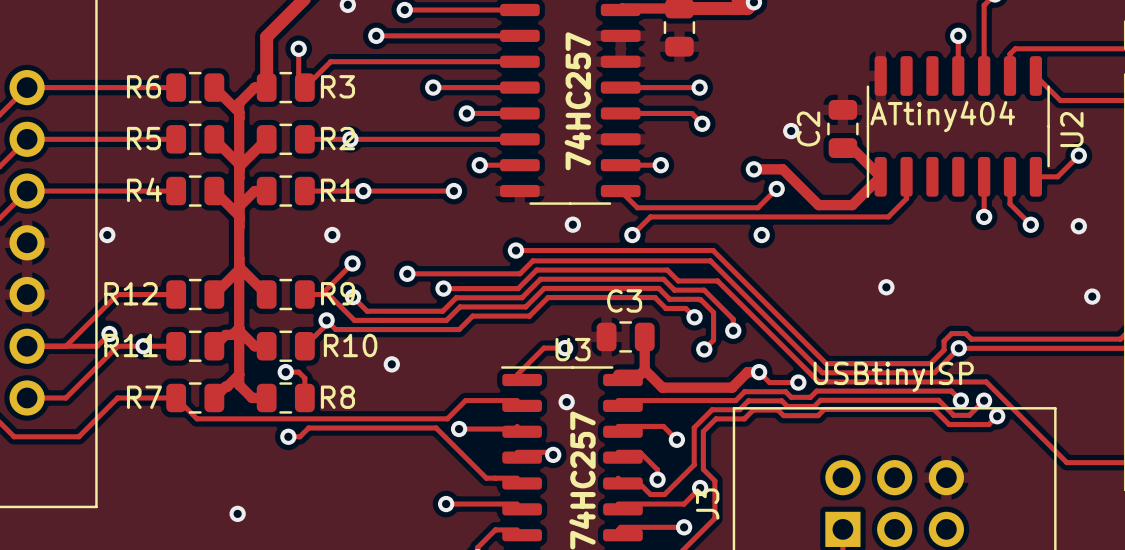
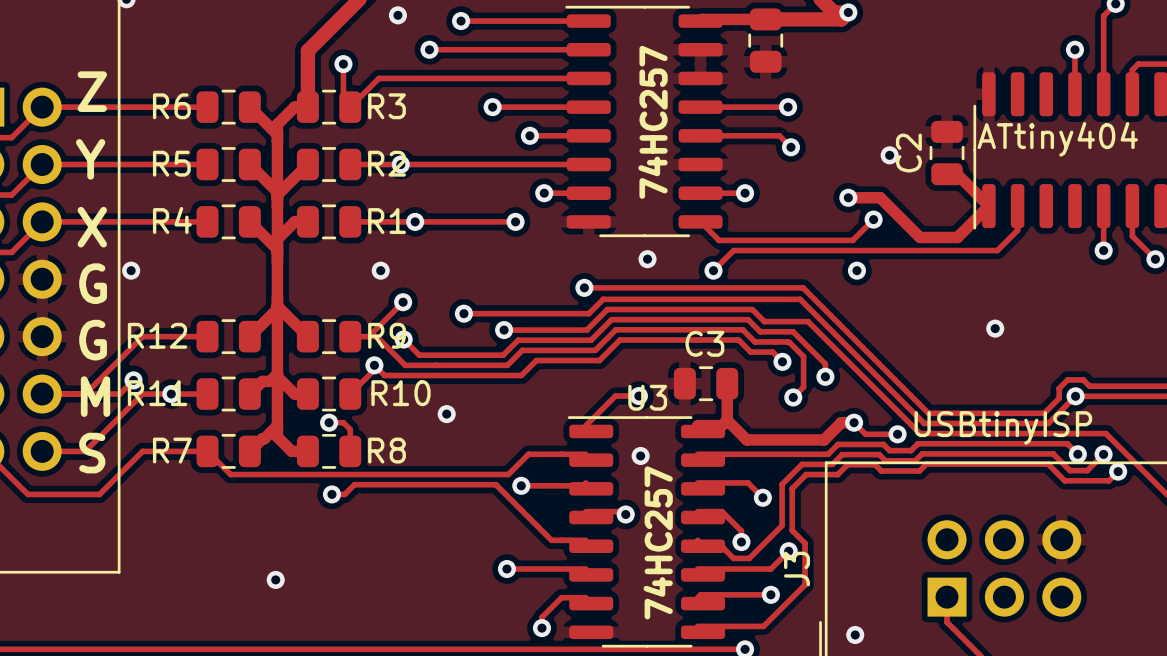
text: none -> Z (92, 91)
text: none -> Y (90, 159)
text: none -> X (92, 227)
text: none -> G (93, 283)
text: none -> G (93, 340)
text: none -> M (95, 396)
text: none -> S (92, 453)

